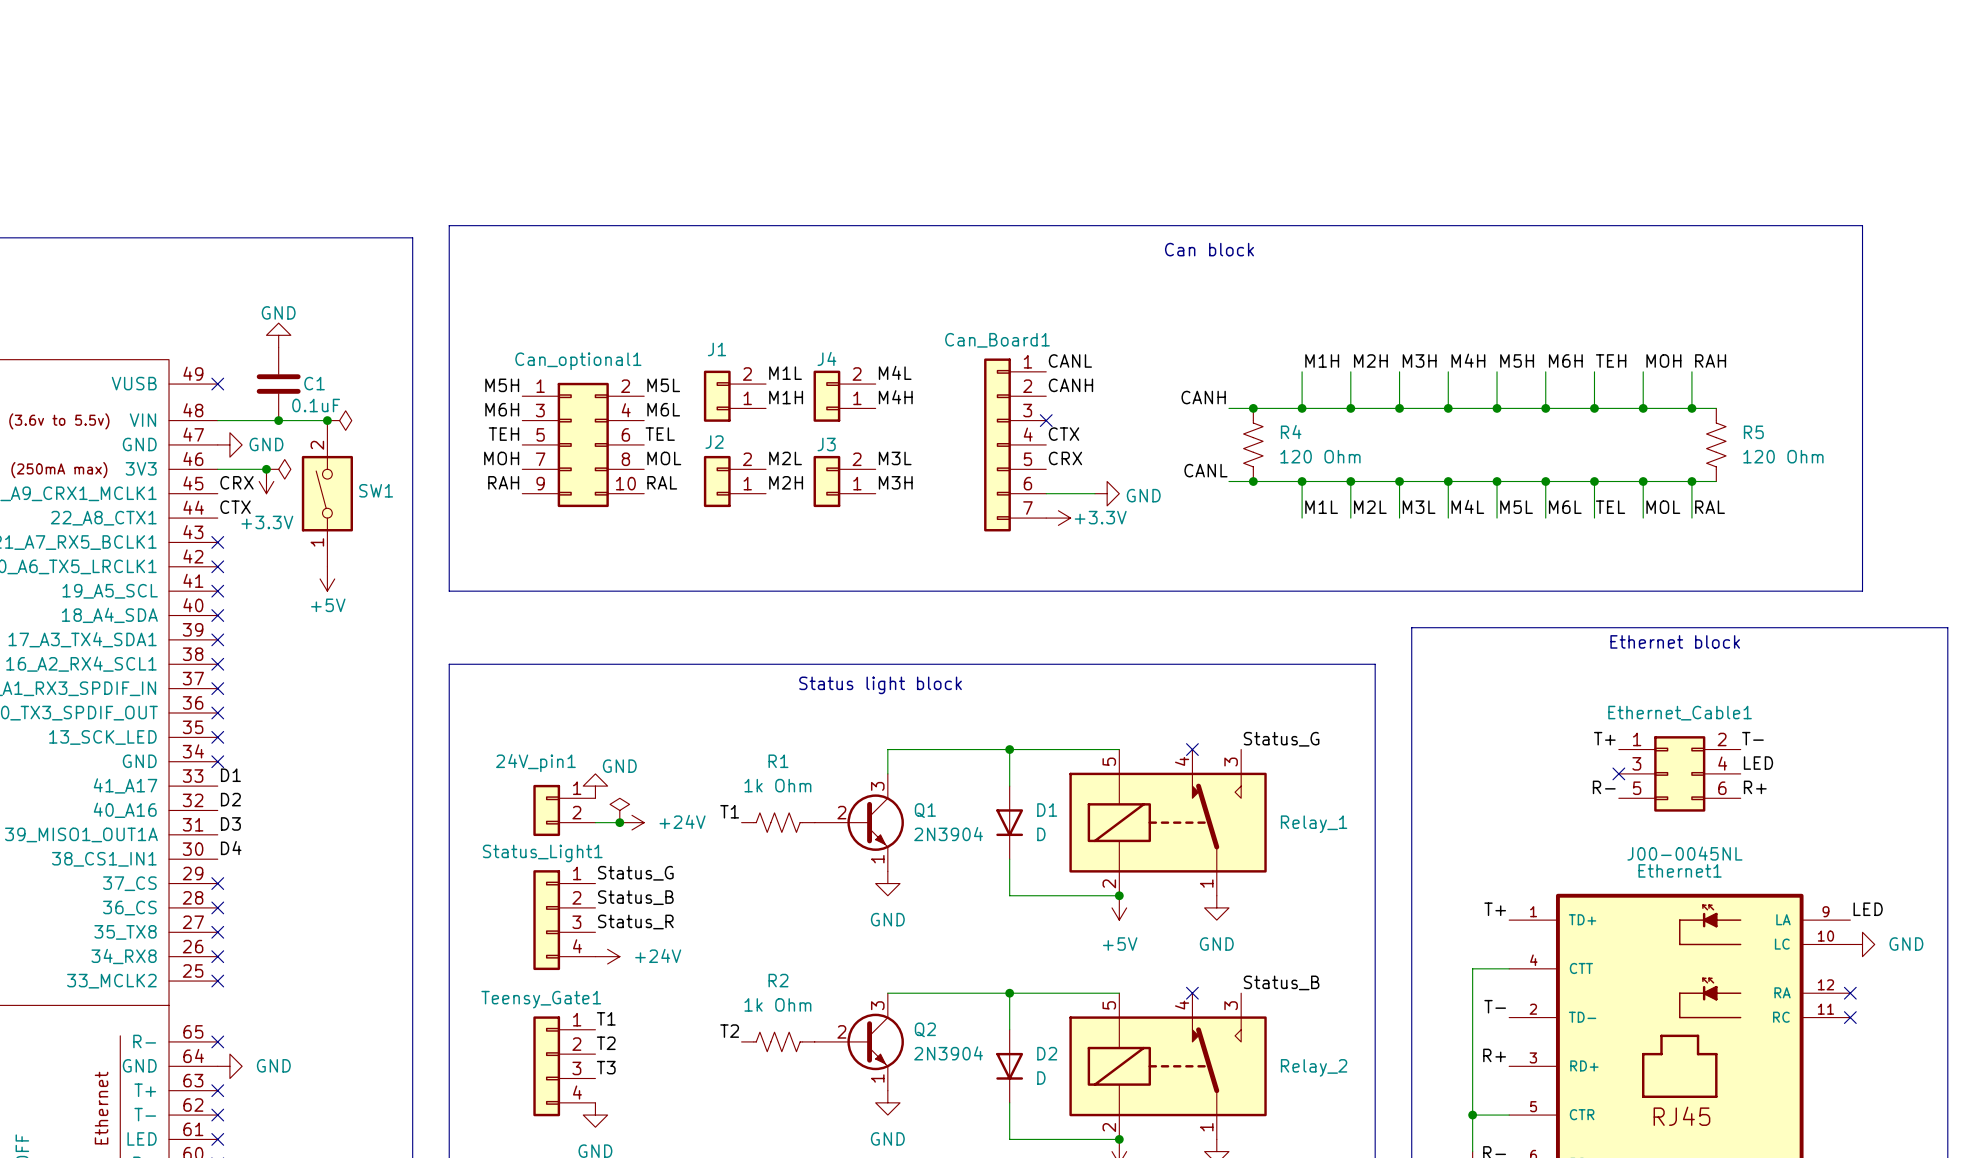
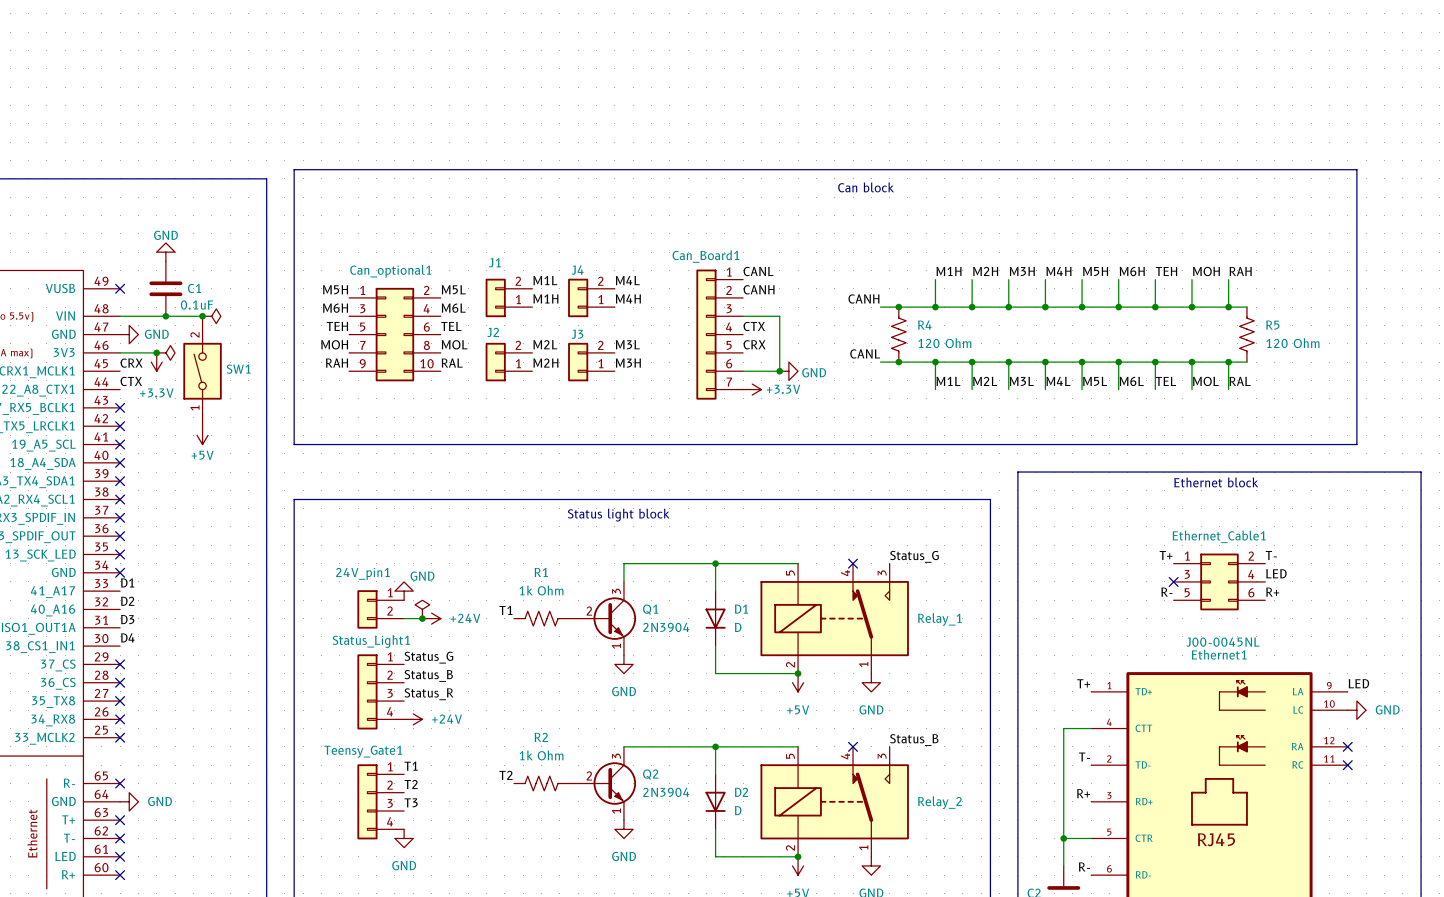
wire: none -> (743, 316) (779, 316) (779, 371)
no-connect mark: (1046, 420) -> none
junction: none -> (779, 371)

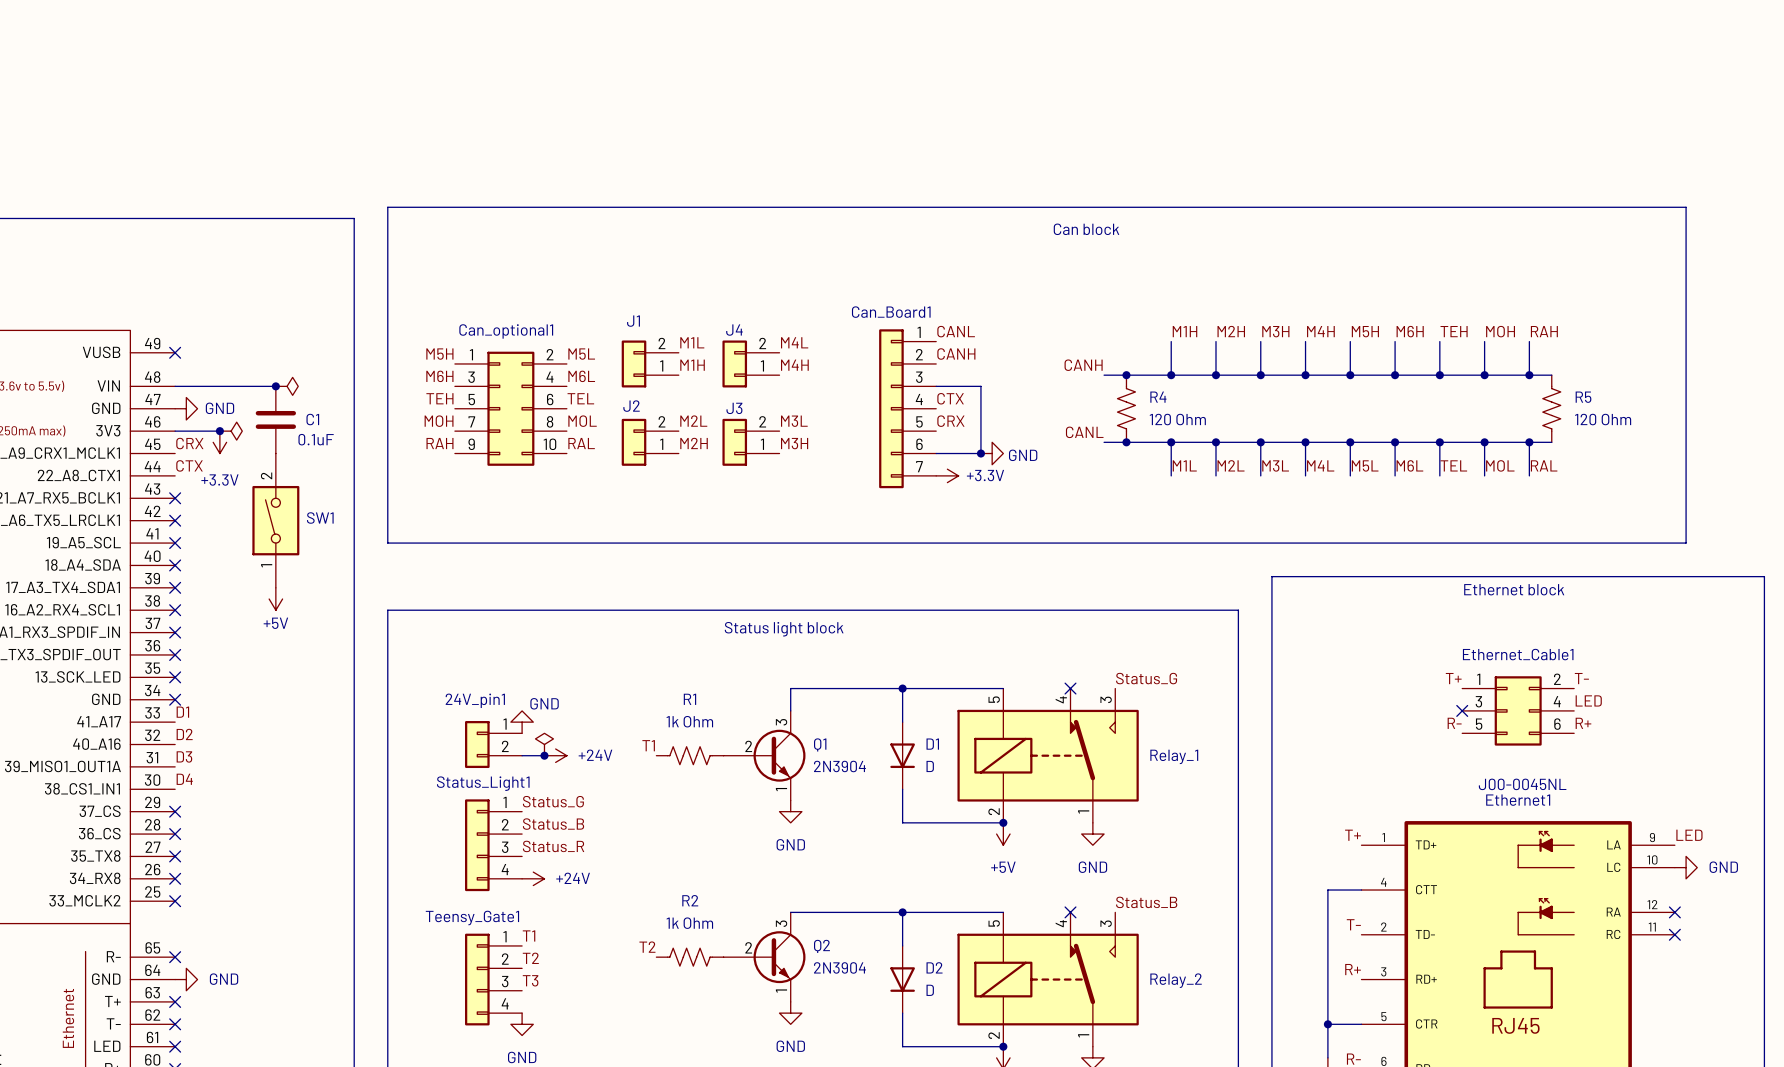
power symbol: GND (165, 252) -> none
C1 position: (165, 288) -> (275, 419)
junction: (165, 316) -> none
SW1 position: (202, 371) -> (275, 520)
power symbol position: +5V (202, 435) -> +5V (275, 599)

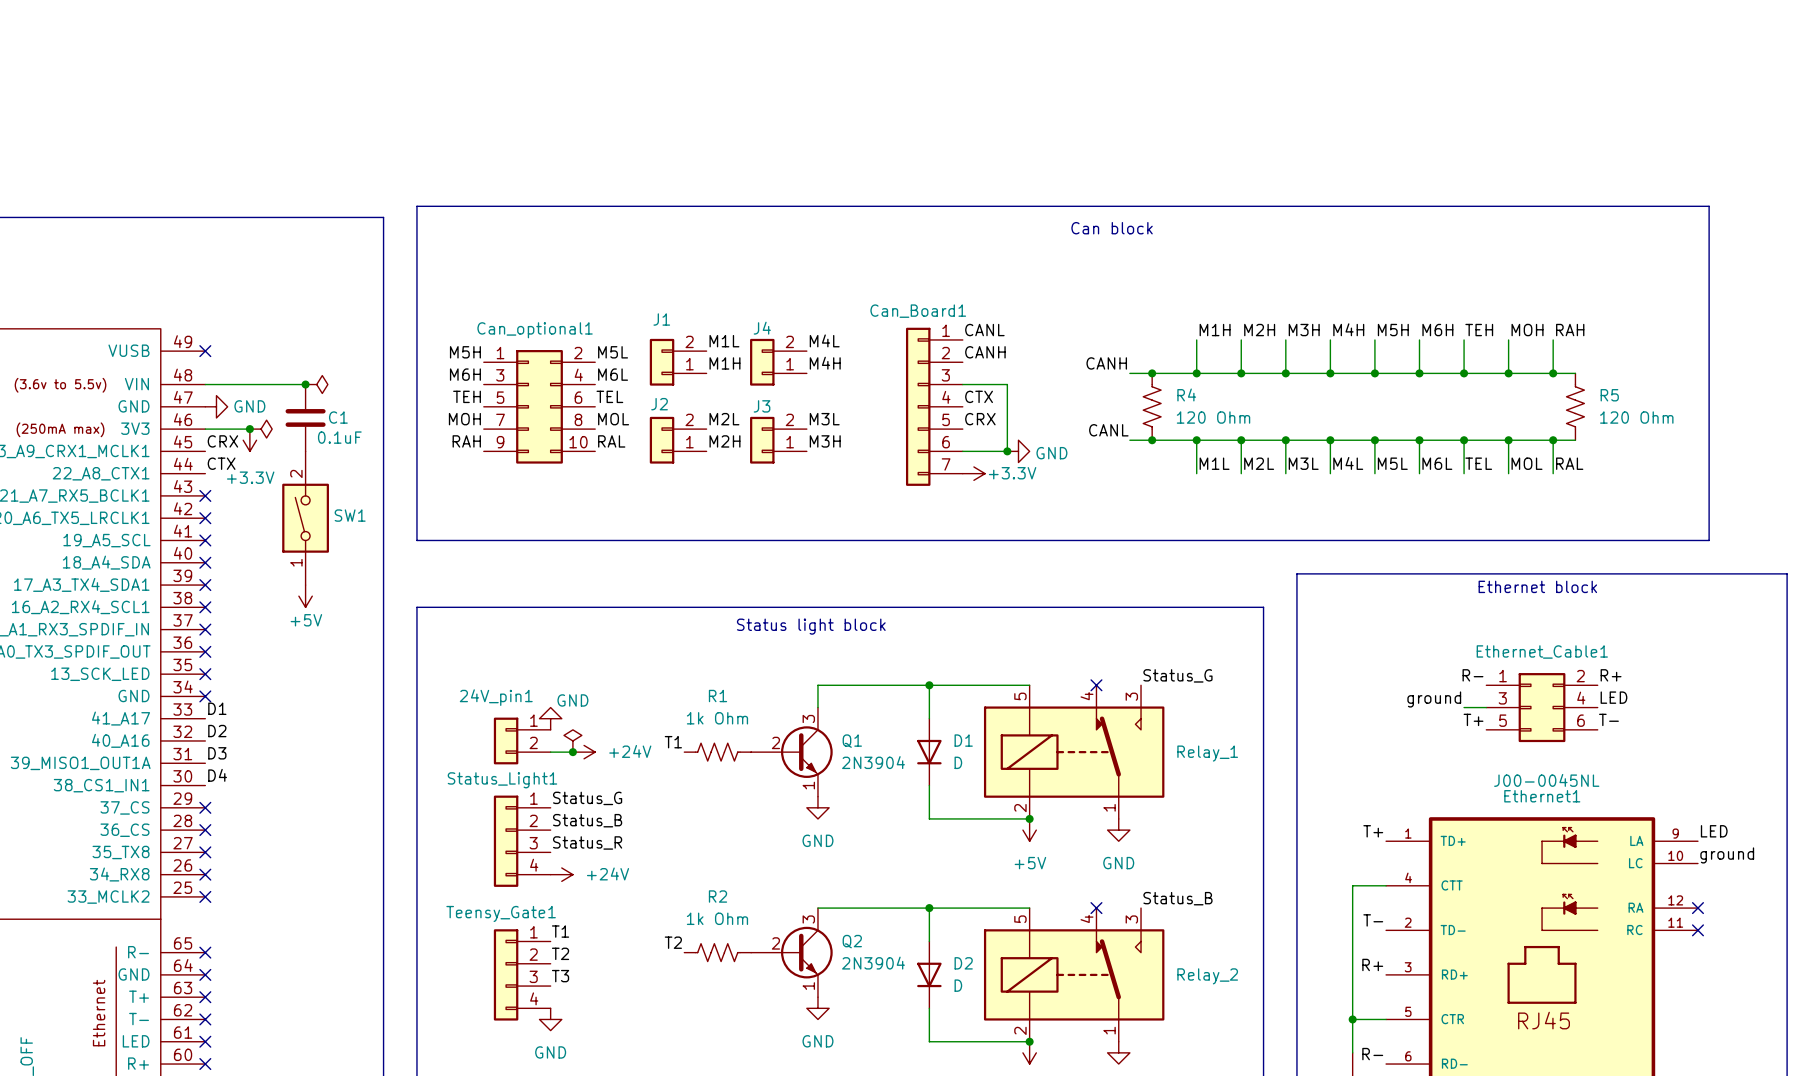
label: T+ (1453, 678) -> R- (1472, 675)
label: T- (1581, 678) -> R+ (1611, 675)
label: none -> ground (1434, 699)
wire: none -> (1464, 707) (1486, 707)
no-connect mark: (1462, 710) -> none
label: R- (1454, 723) -> T+ (1473, 719)
label: R+ (1583, 723) -> T- (1608, 719)
label: none -> ground (1727, 855)
power symbol: GND (1686, 867) -> none
no-connect mark: none -> (205, 974)
power symbol: GND (186, 979) -> none

